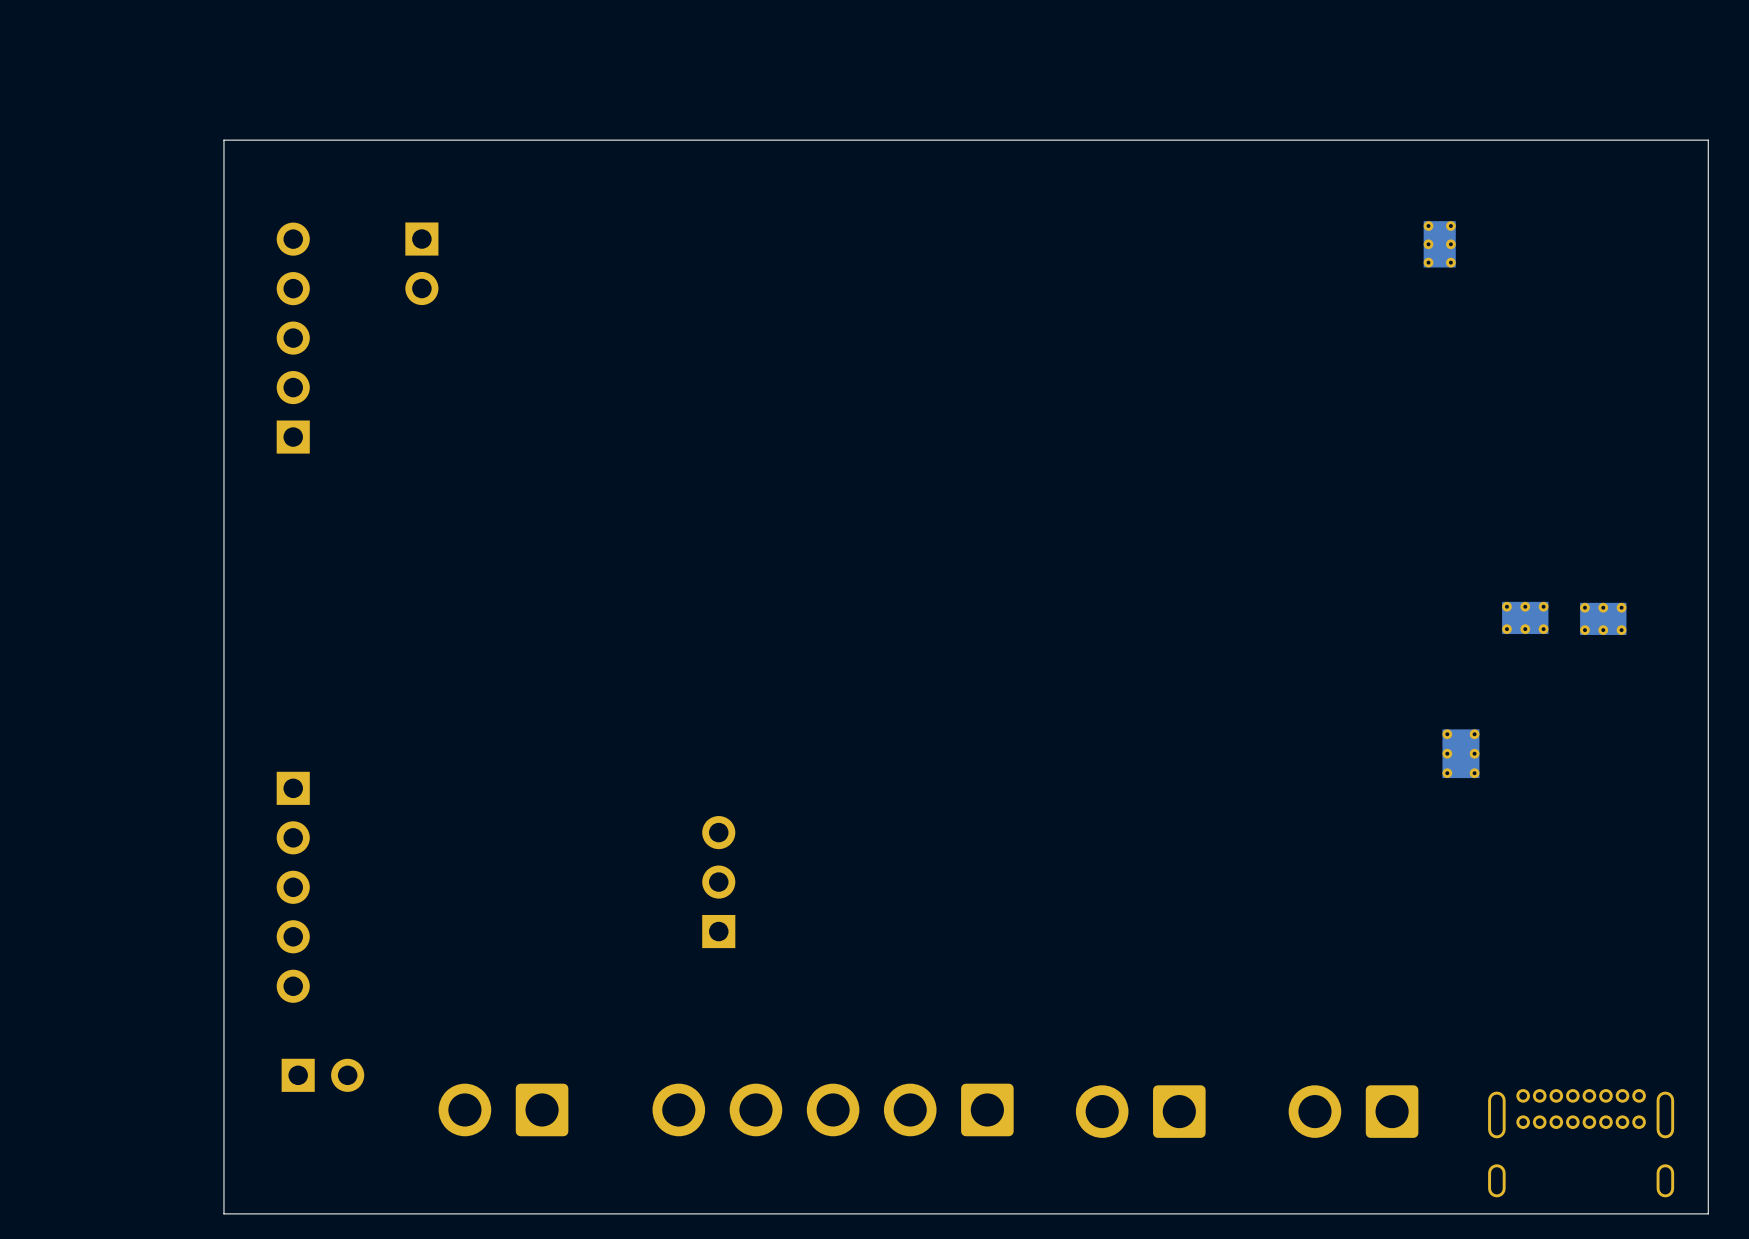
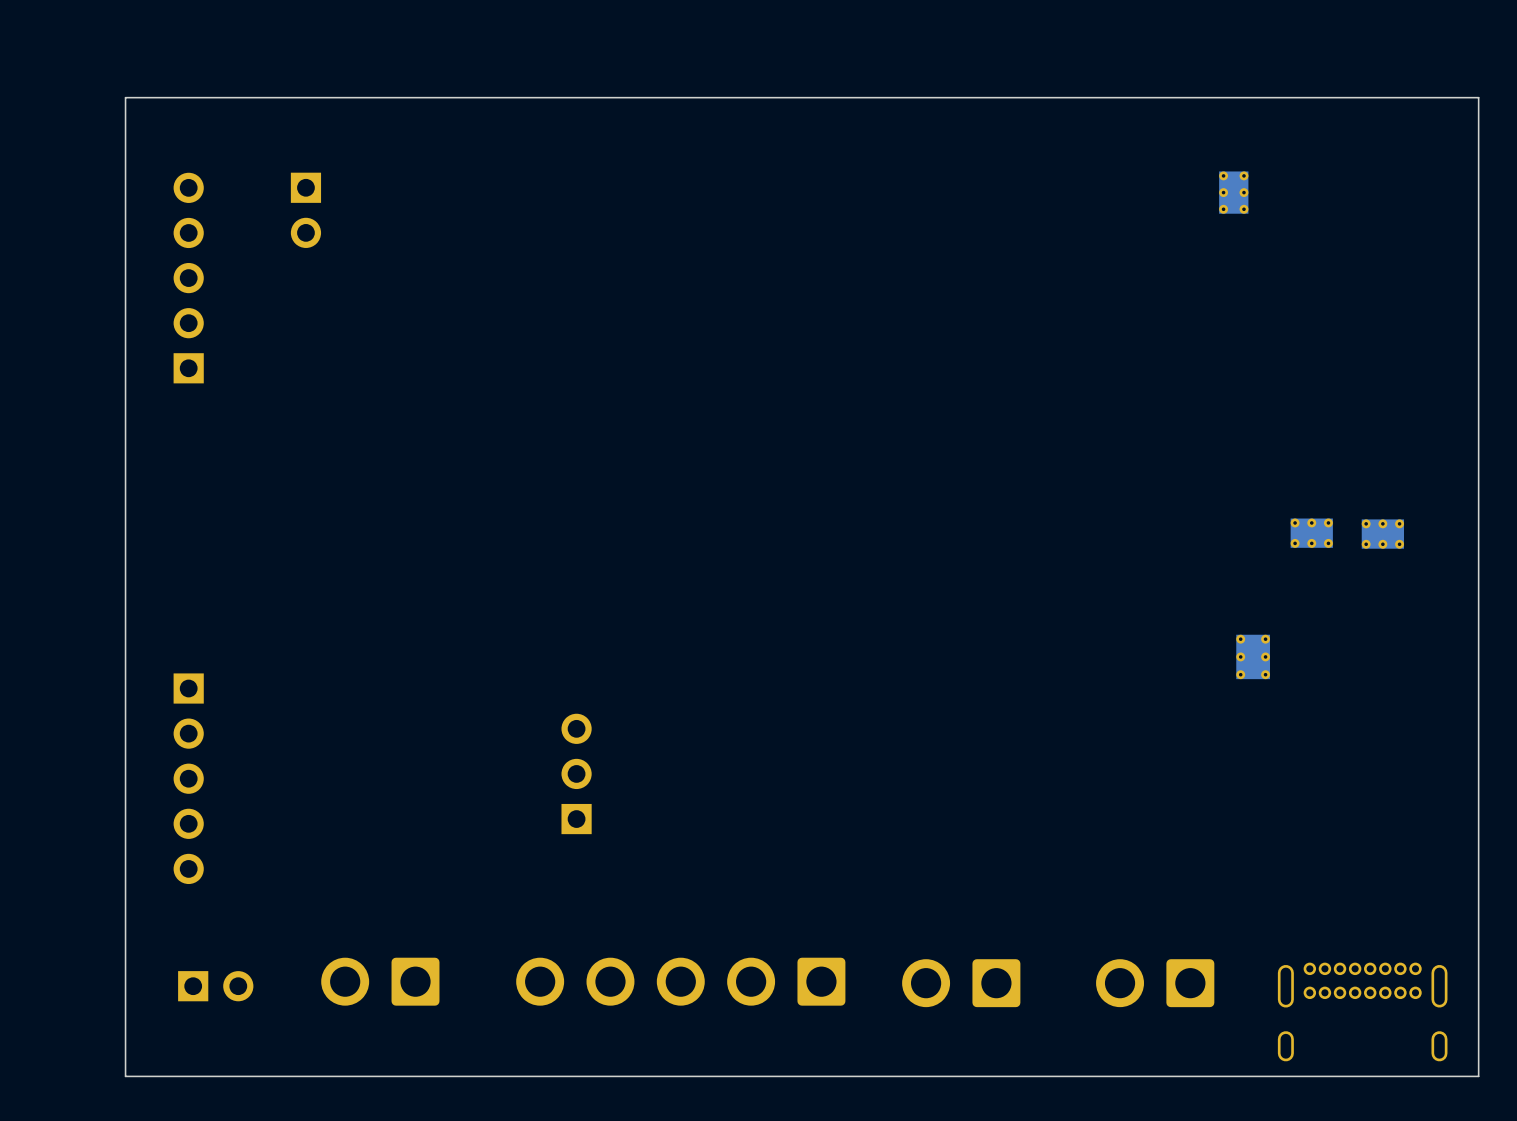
part position: (322, 1075) -> (215, 986)

